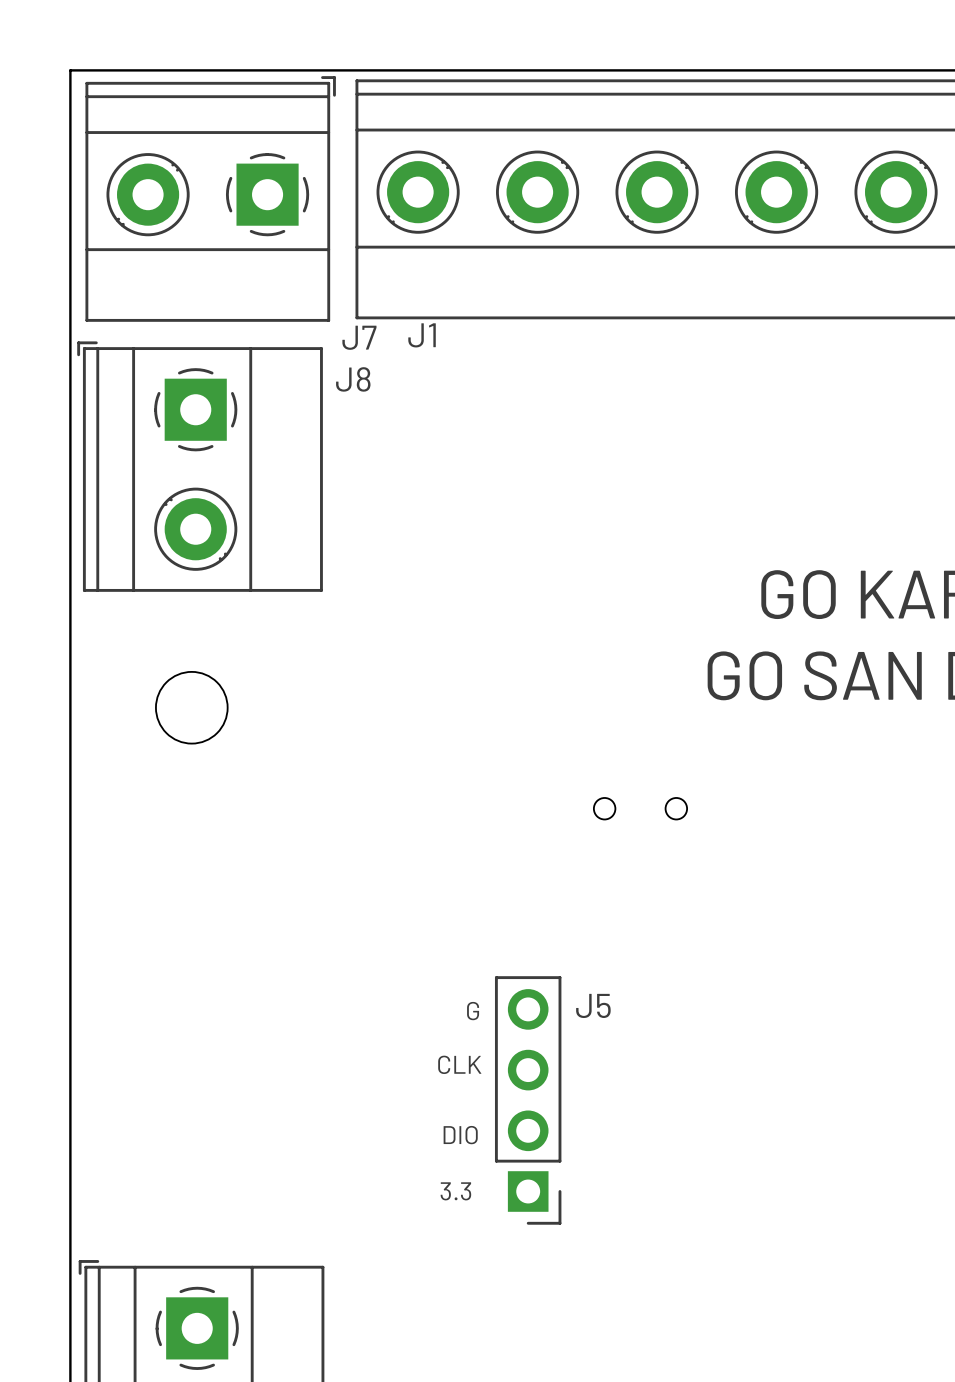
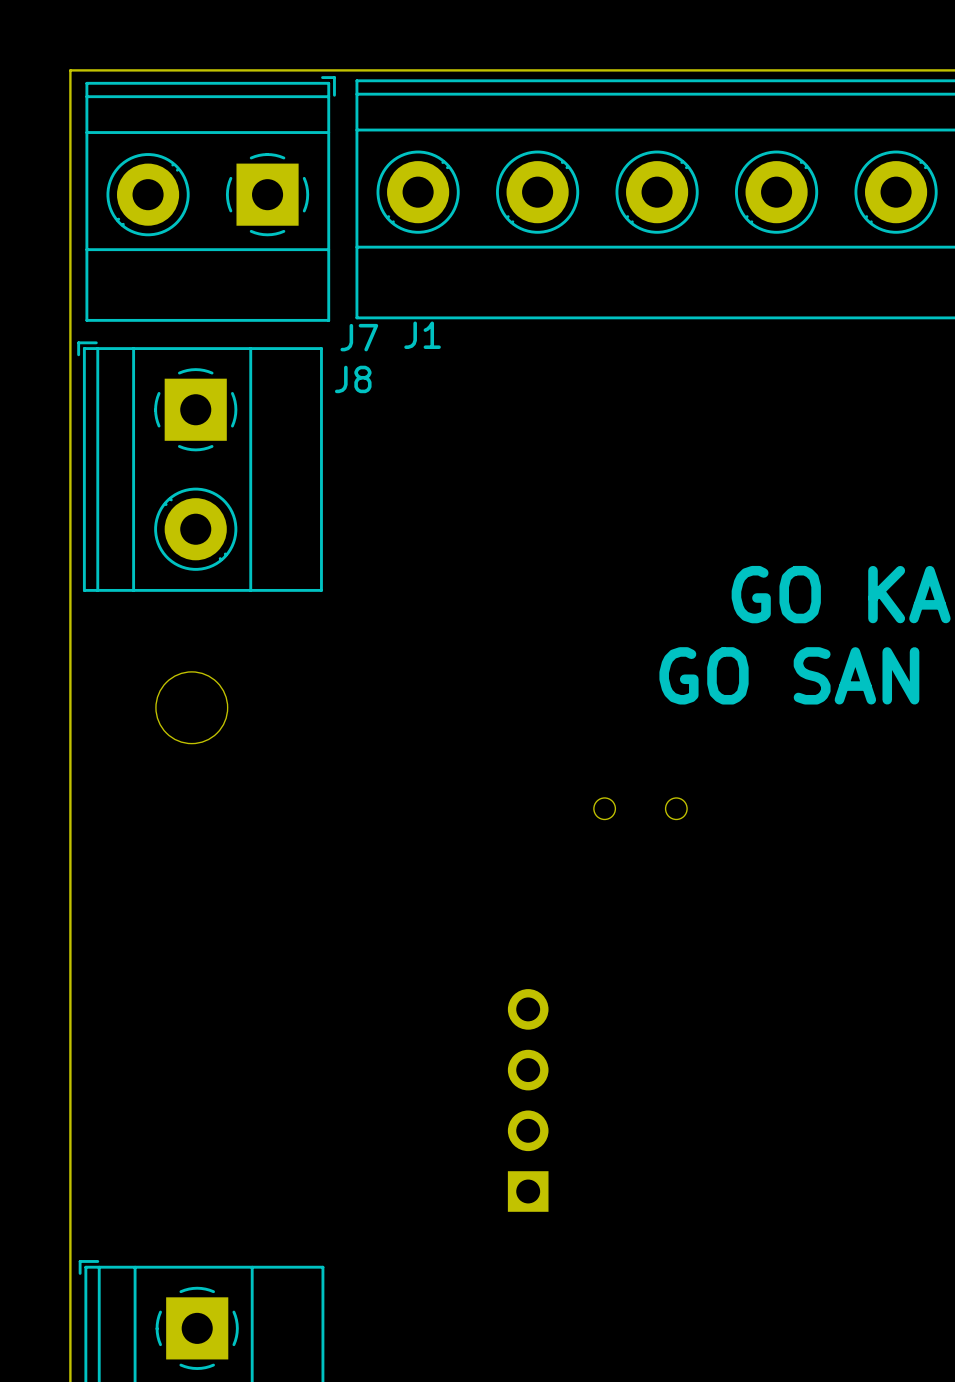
text: G (473, 1011) -> none
text: CLK (459, 1064) -> none
J5 side: bottom (528, 1100) -> top (528, 1100)
text: DIO (460, 1135) -> none
text: 3.3 (455, 1191) -> none

